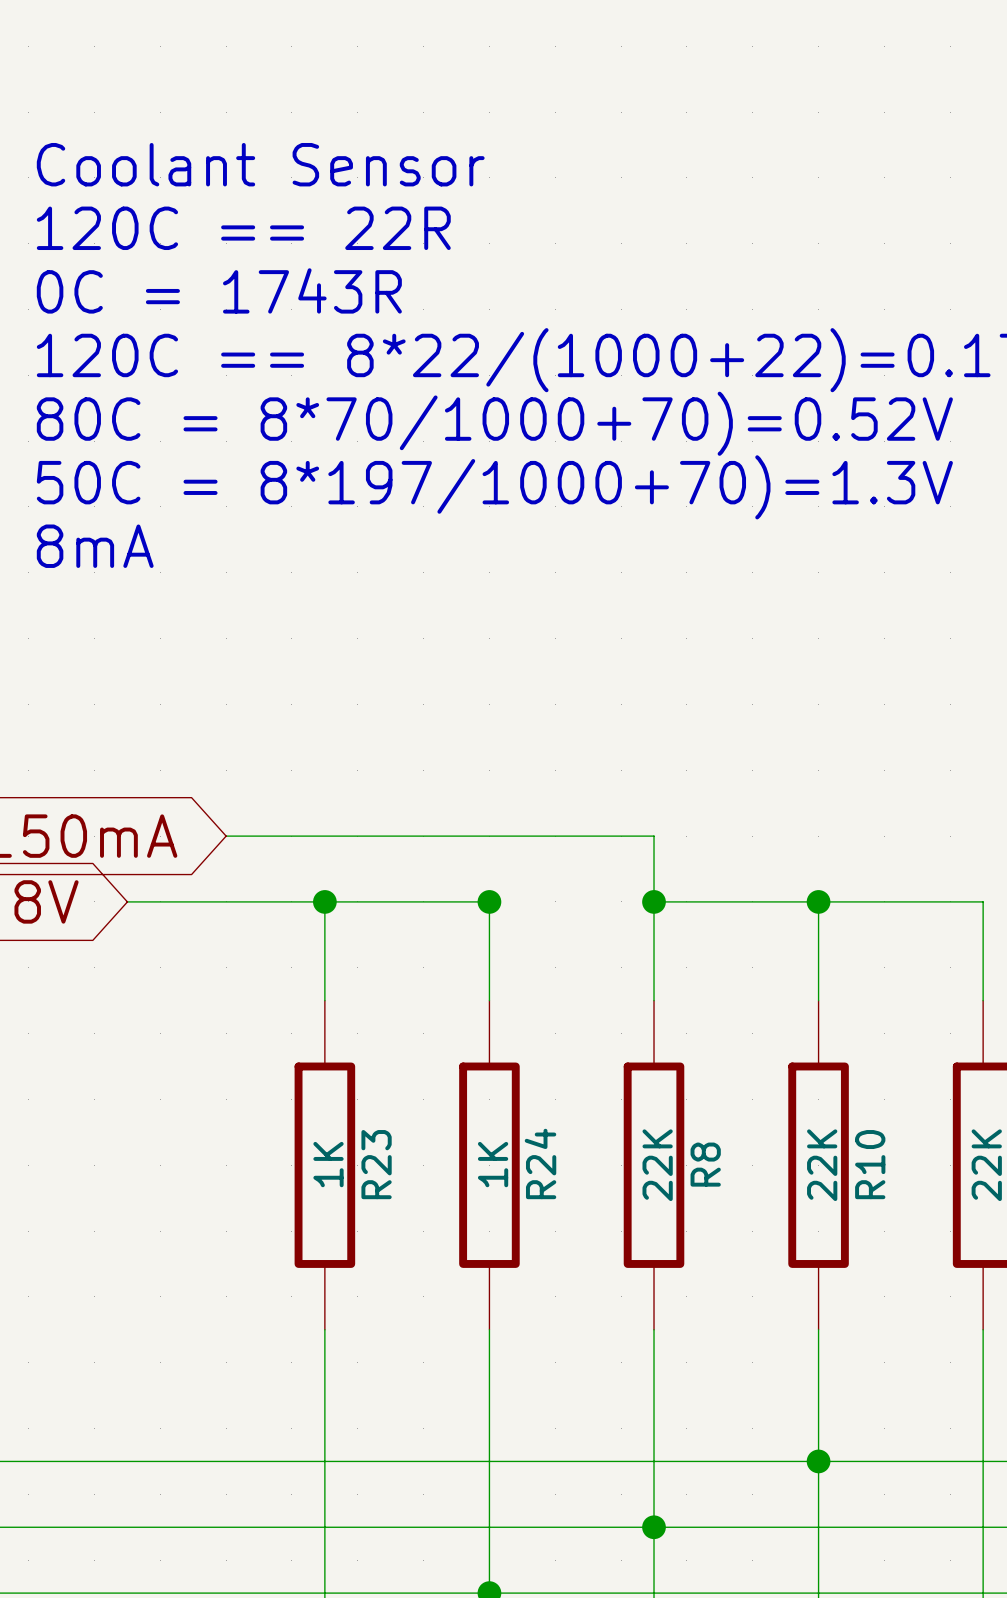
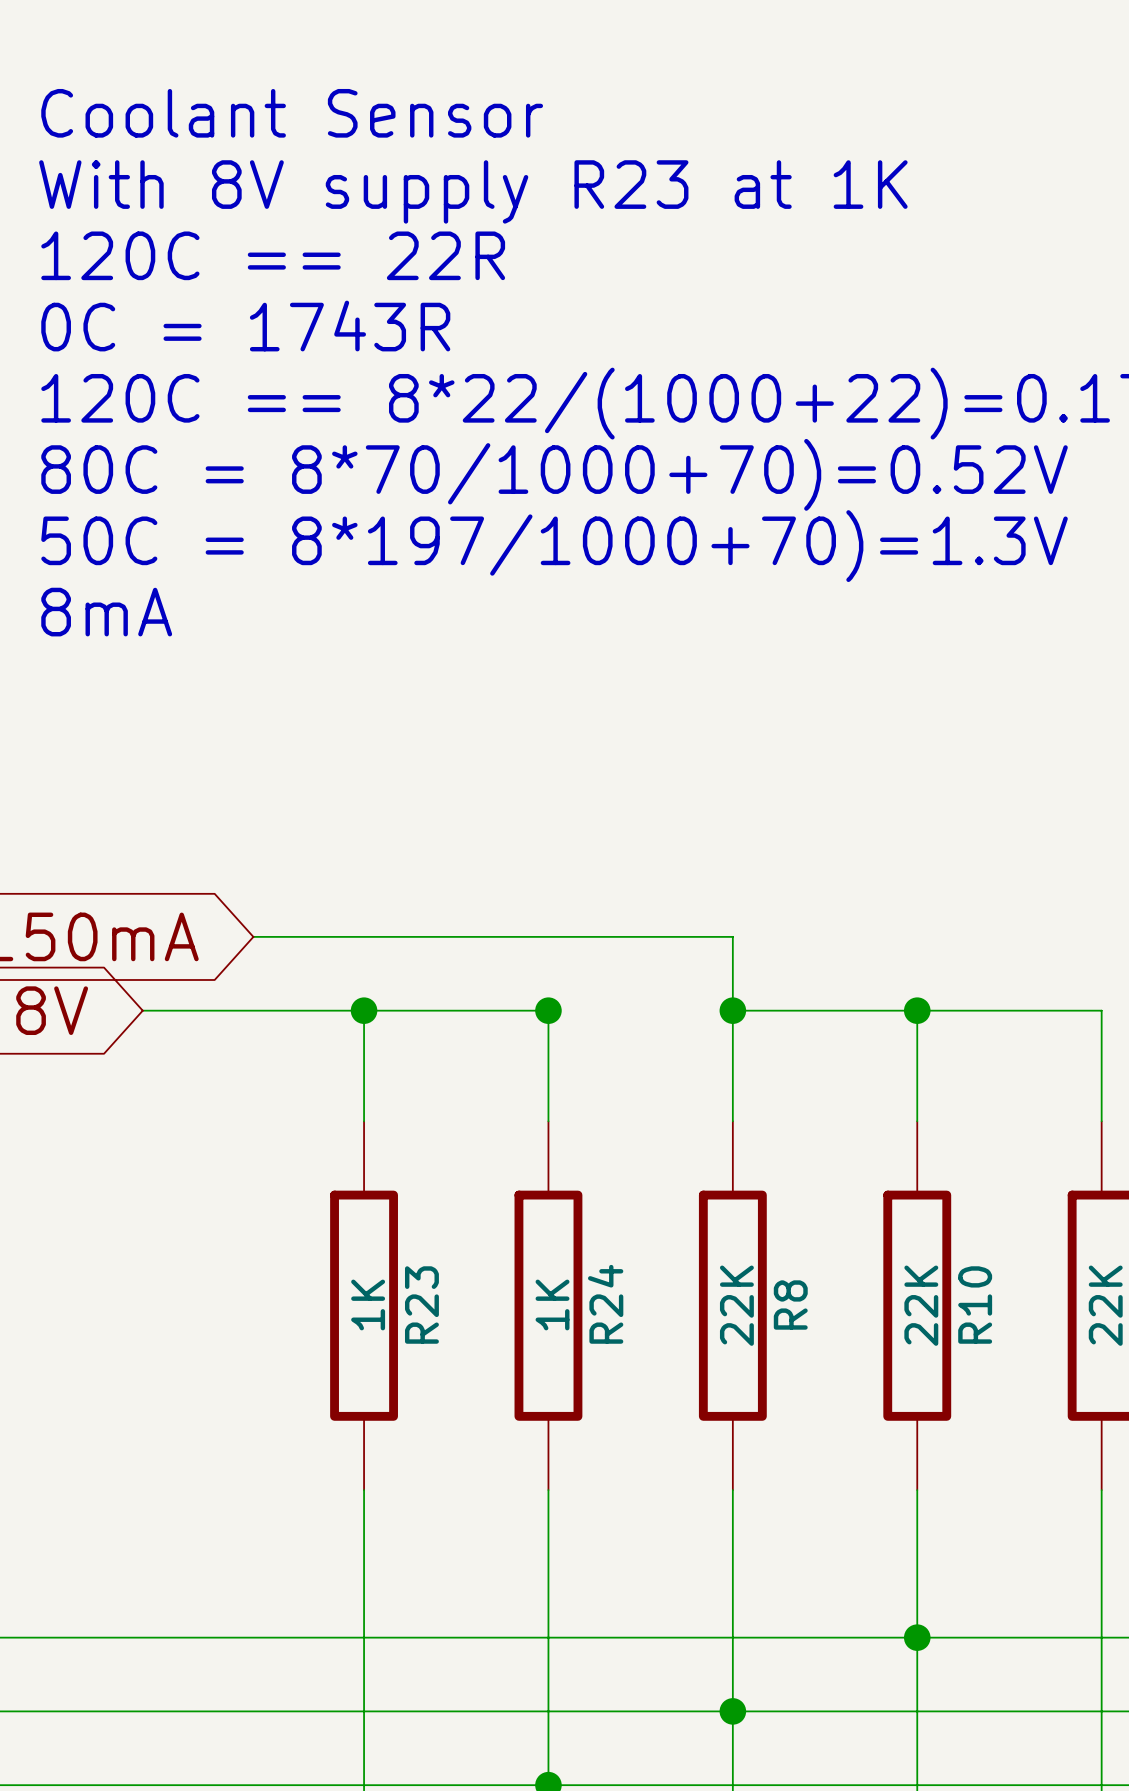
text: none -> Coolant Sensor (292, 113)
text: Coolant Sensor (260, 164) -> With 8V supply R23 at 1K (473, 191)

